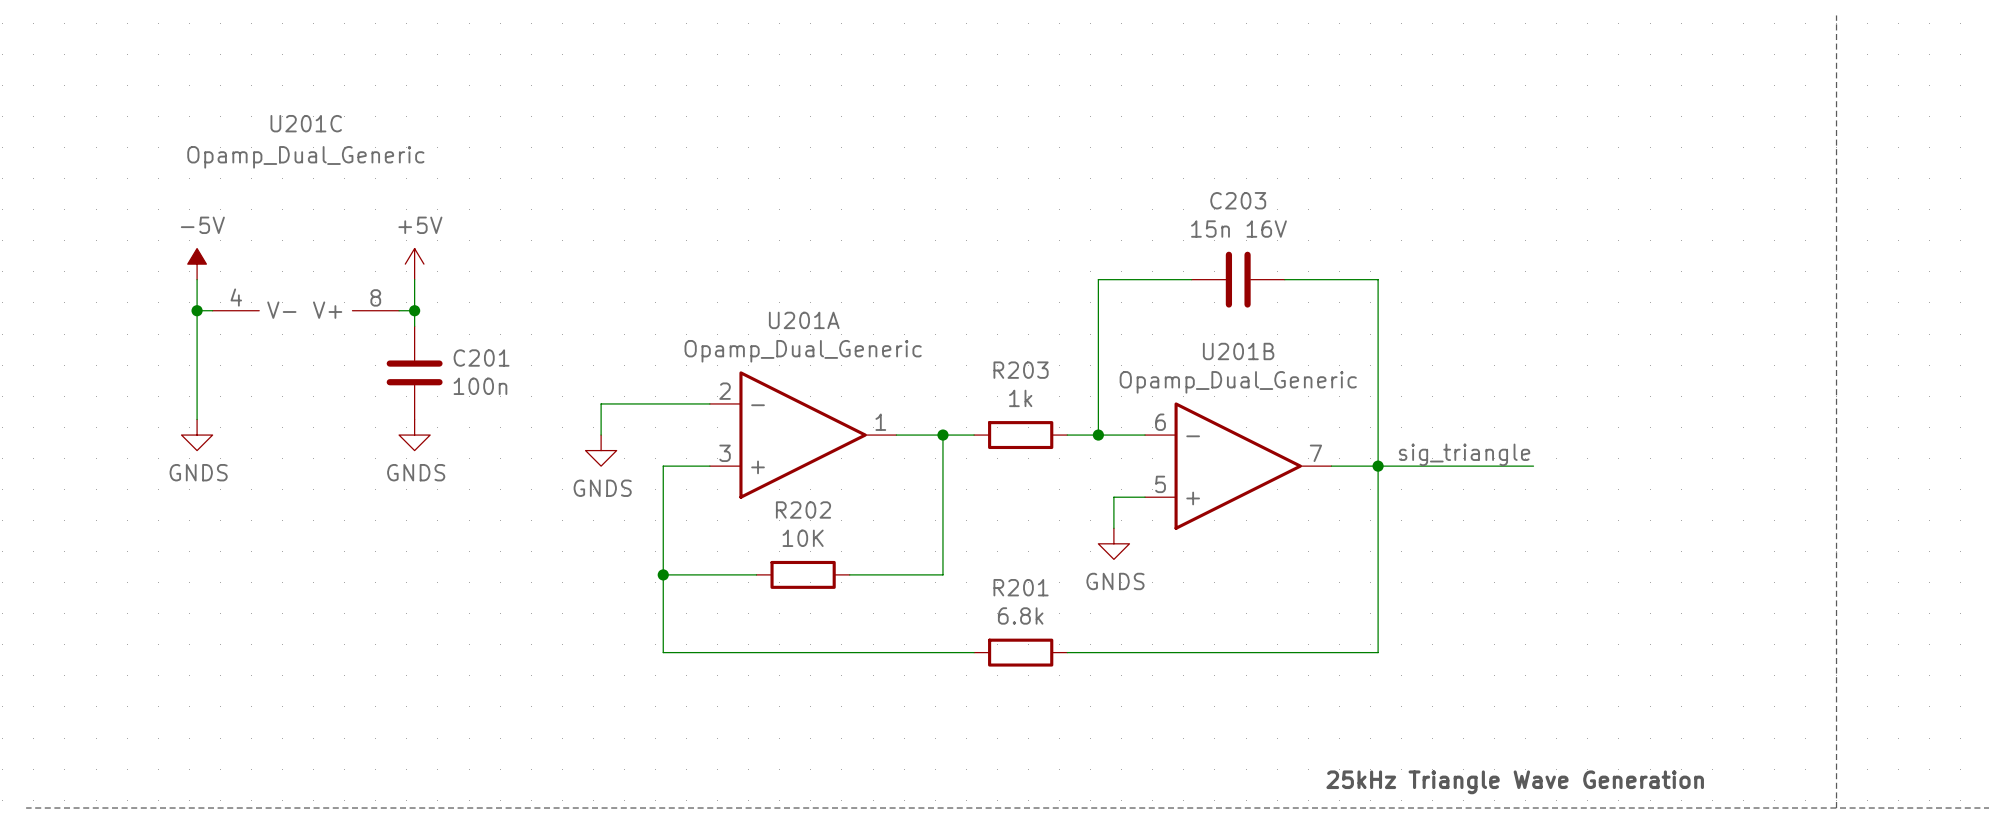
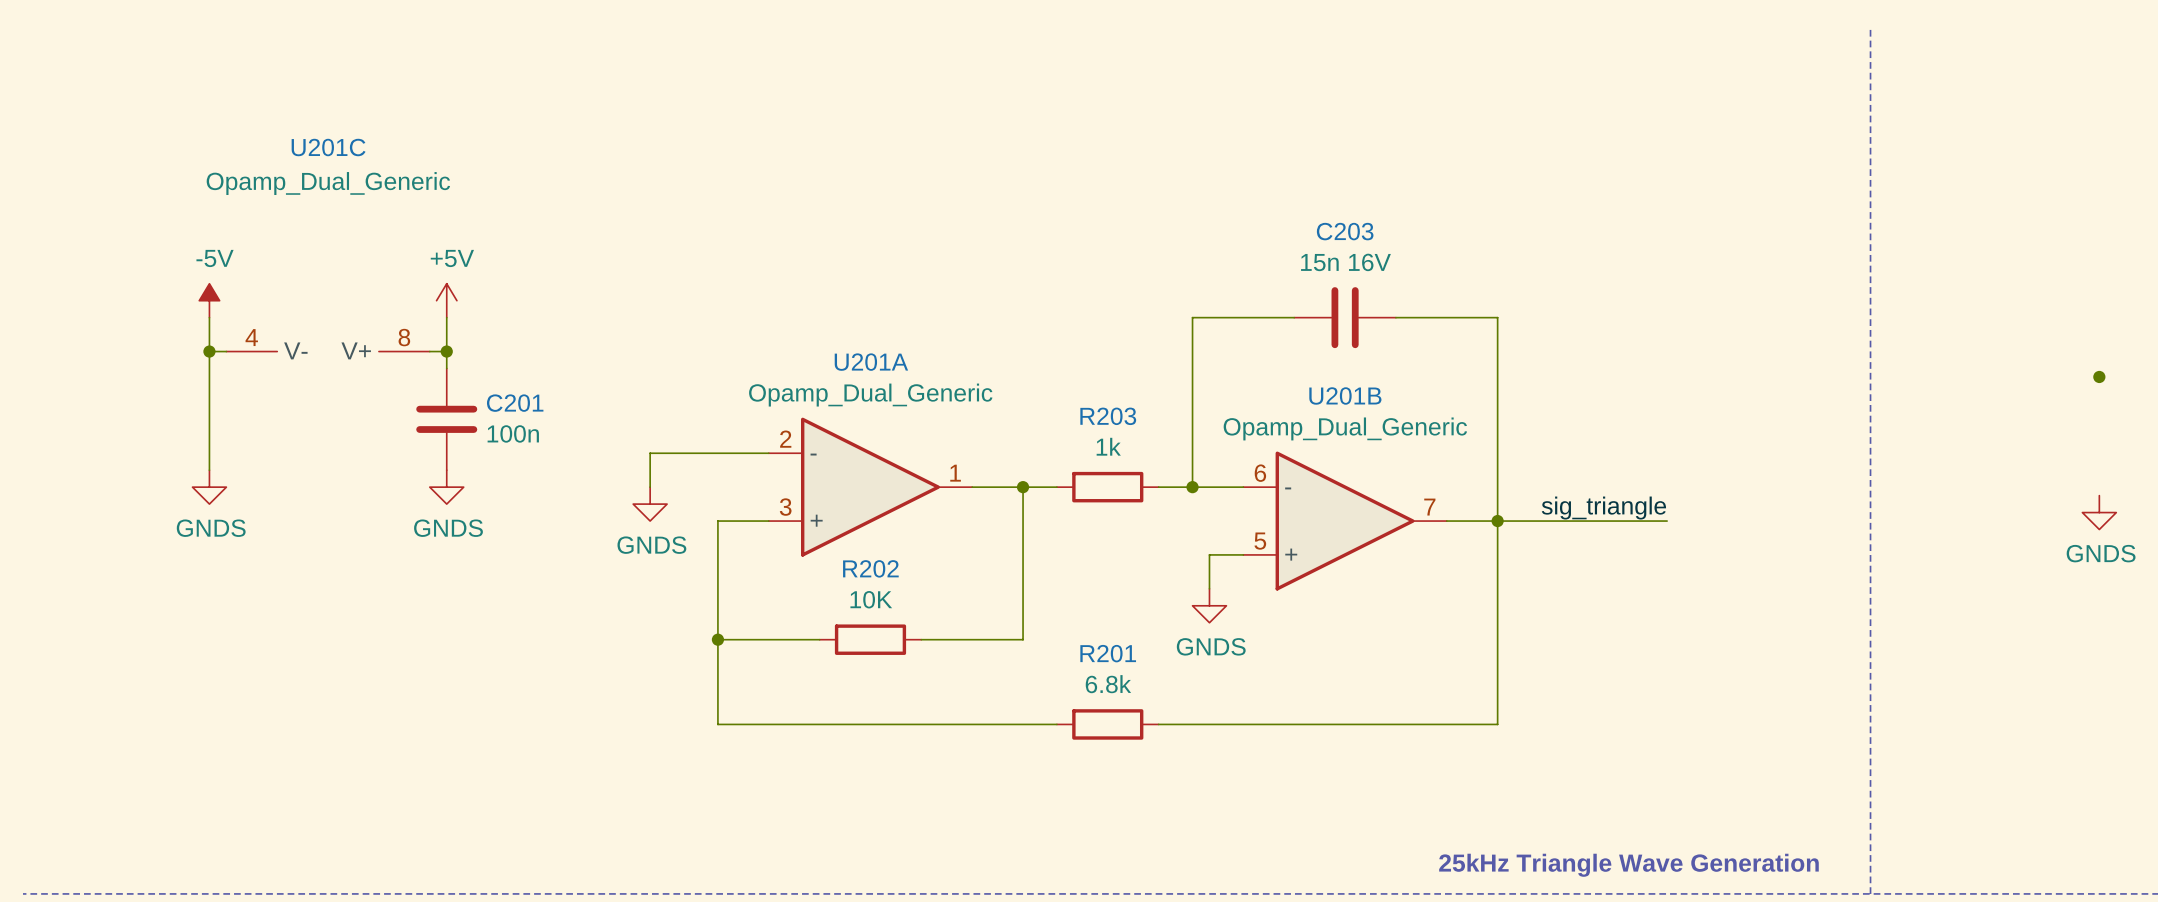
line: (1836, 15) (1836, 808) -> (1870, 29) (1870, 893)
junction: none -> (2099, 376)
power symbol: none -> GNDS (2099, 512)

